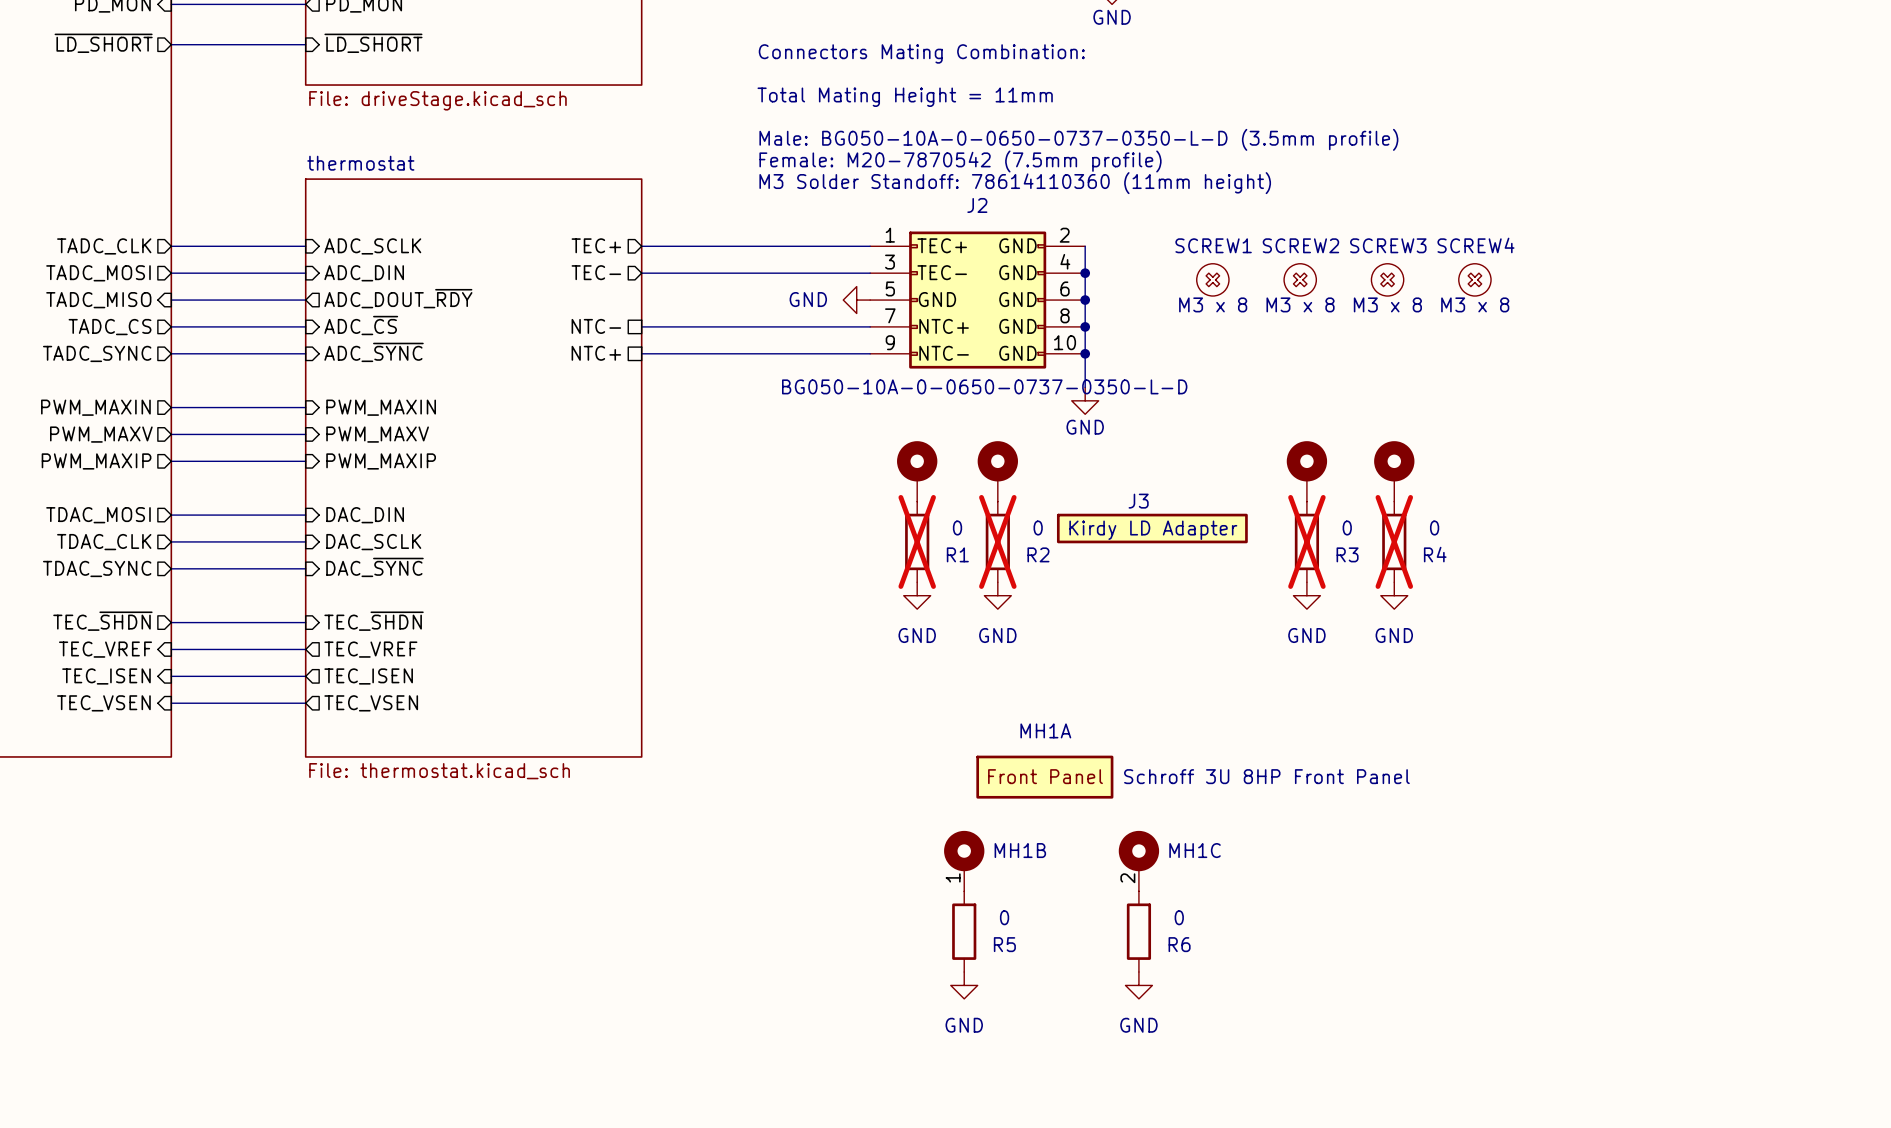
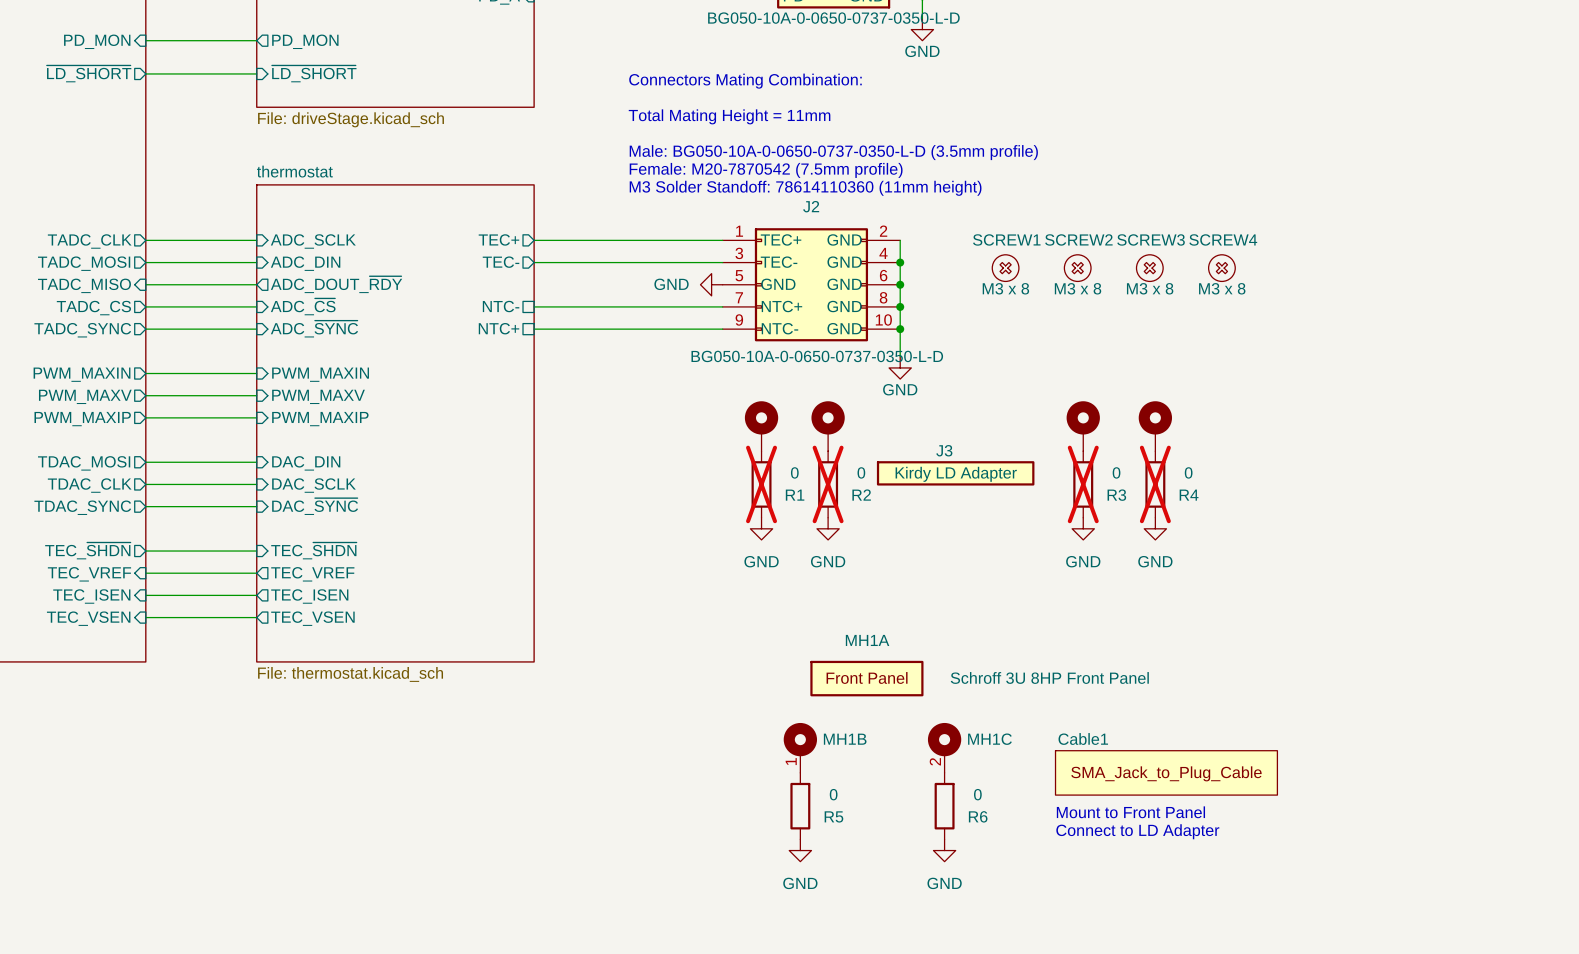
Cable1: none -> (1166, 772)
text: none -> Mount to Front Panel (1130, 812)
text: none -> Connect to LD Adapter (1137, 831)

